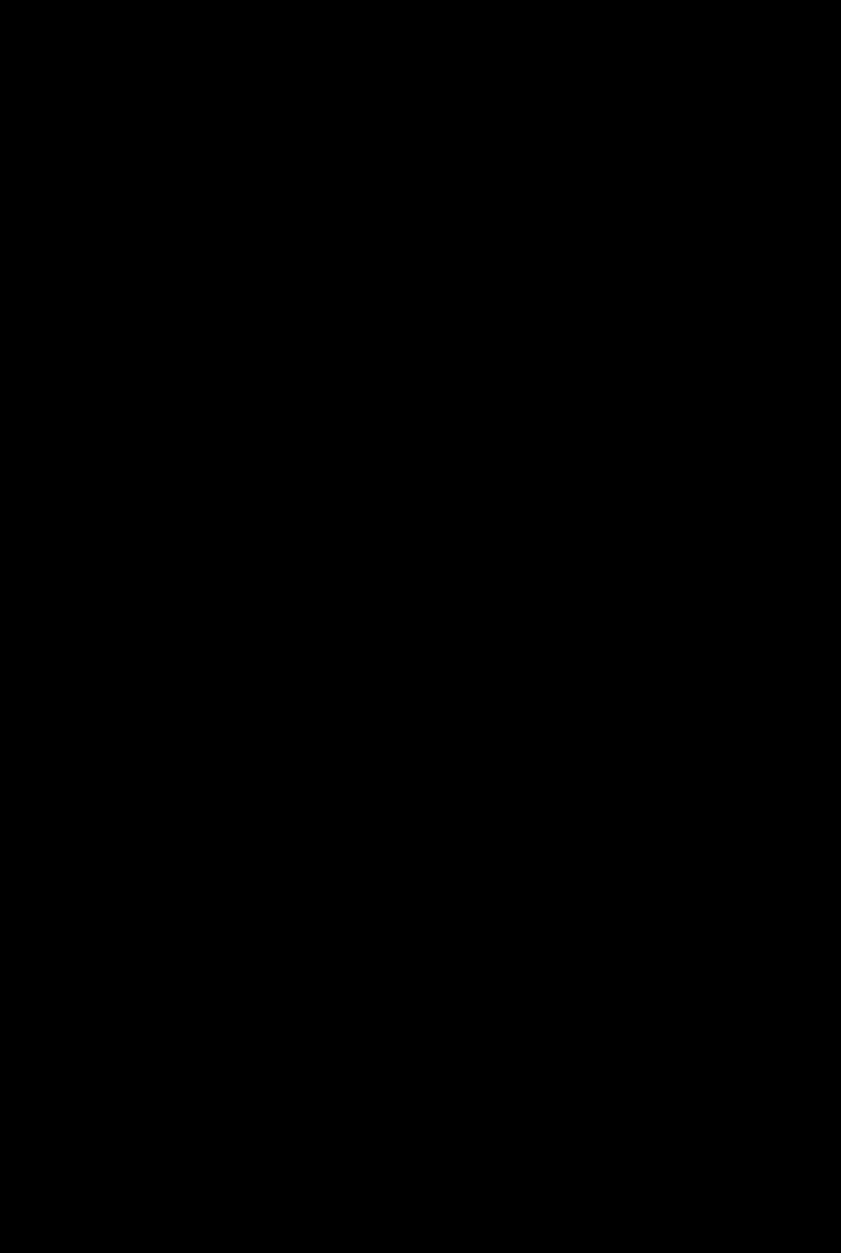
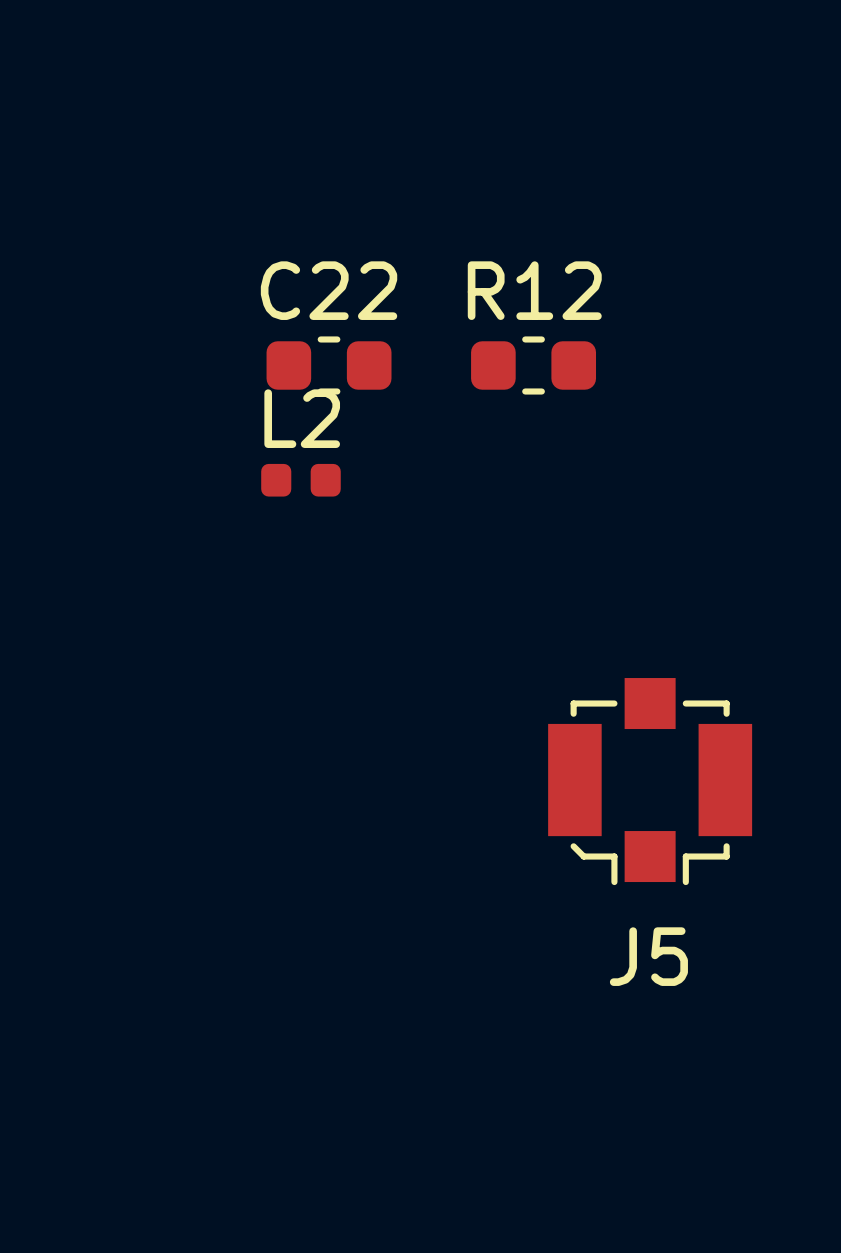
C22: none -> (329, 365)
R12: none -> (533, 365)
L2: none -> (300, 480)
J5: none -> (650, 781)

